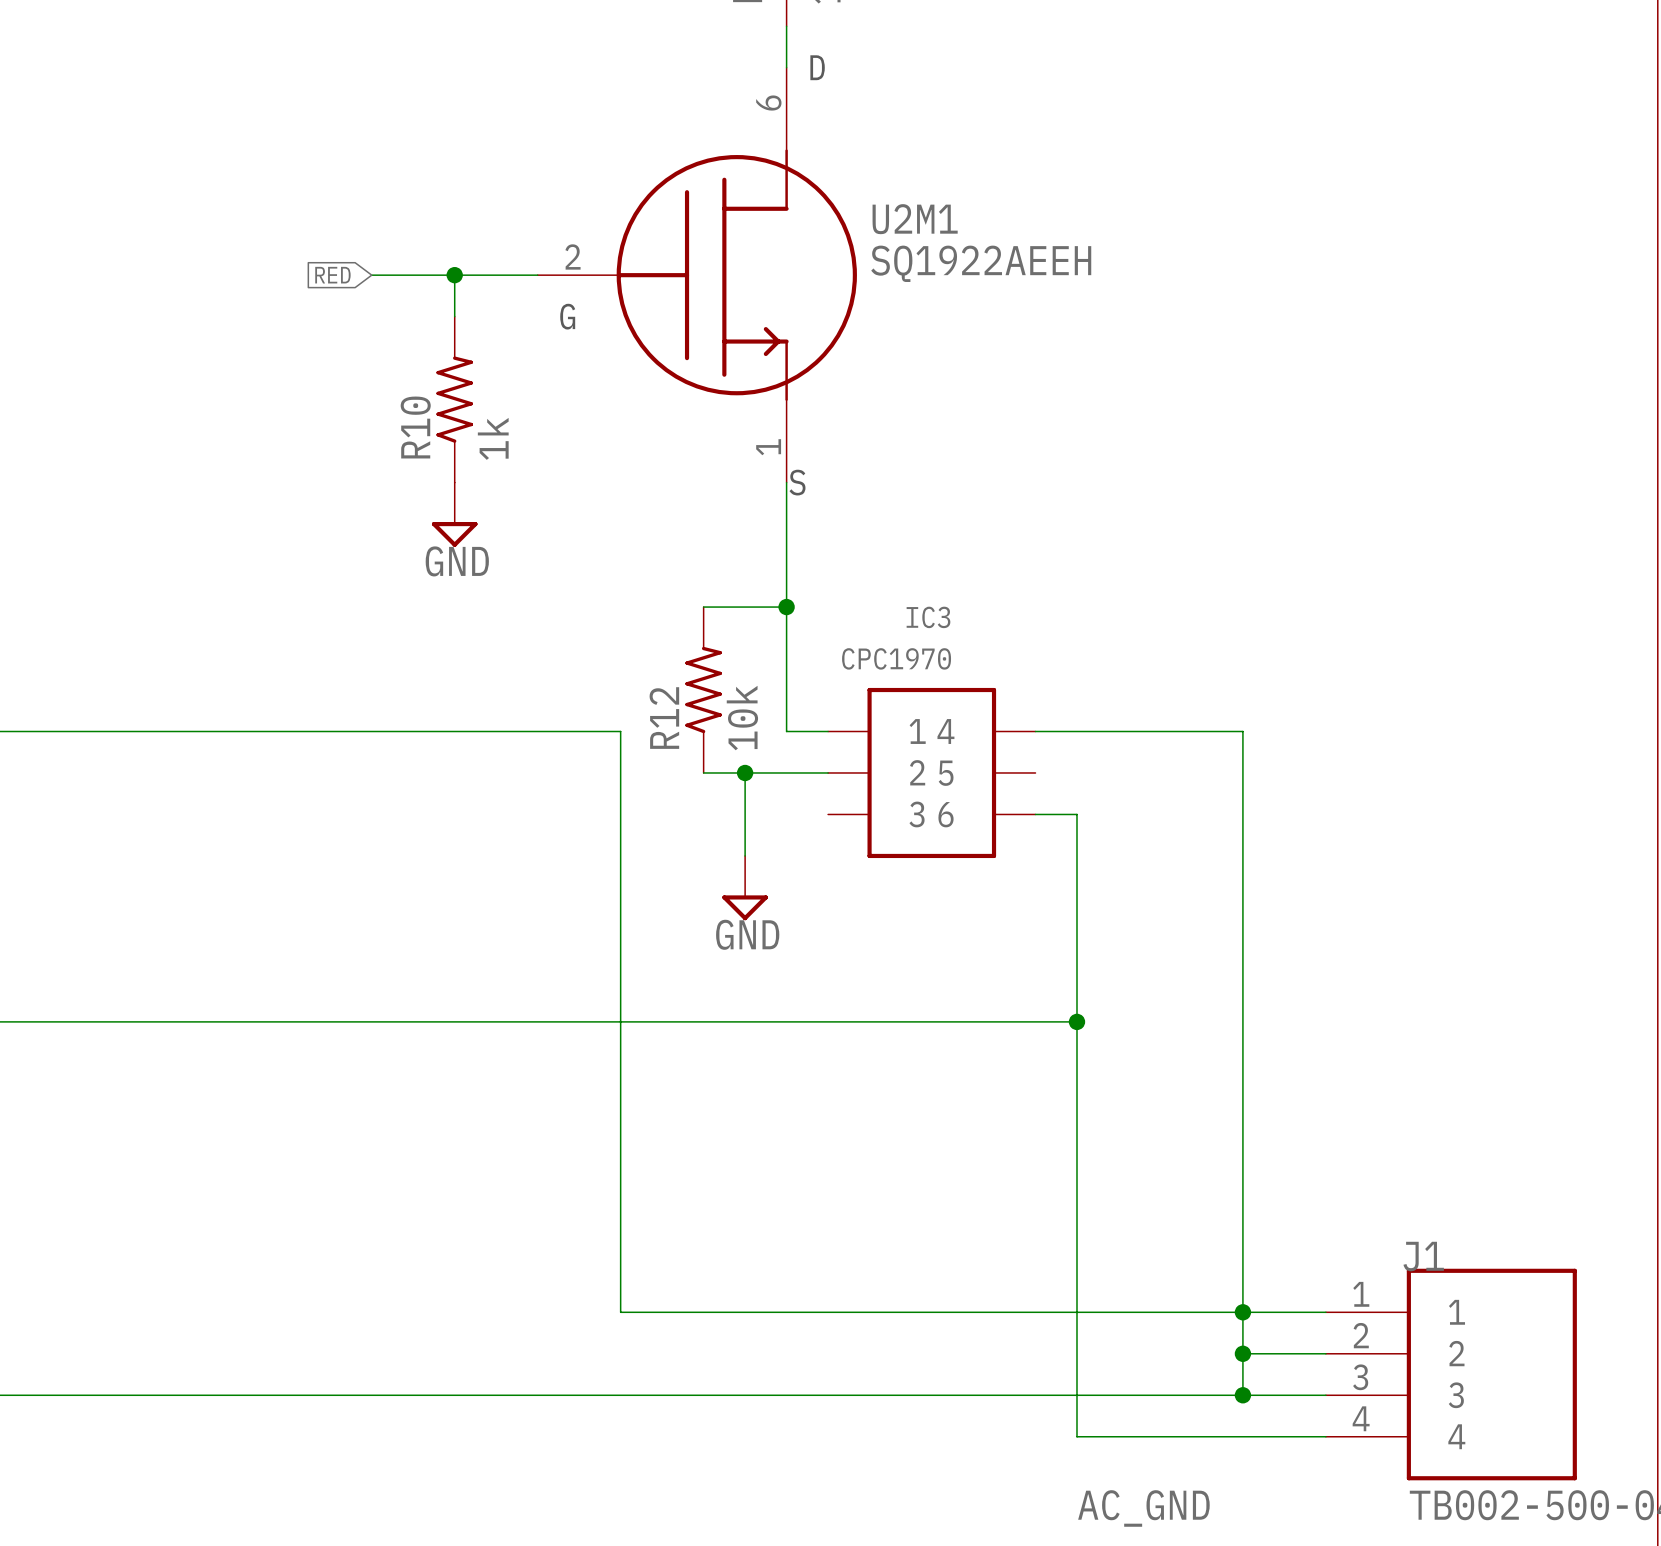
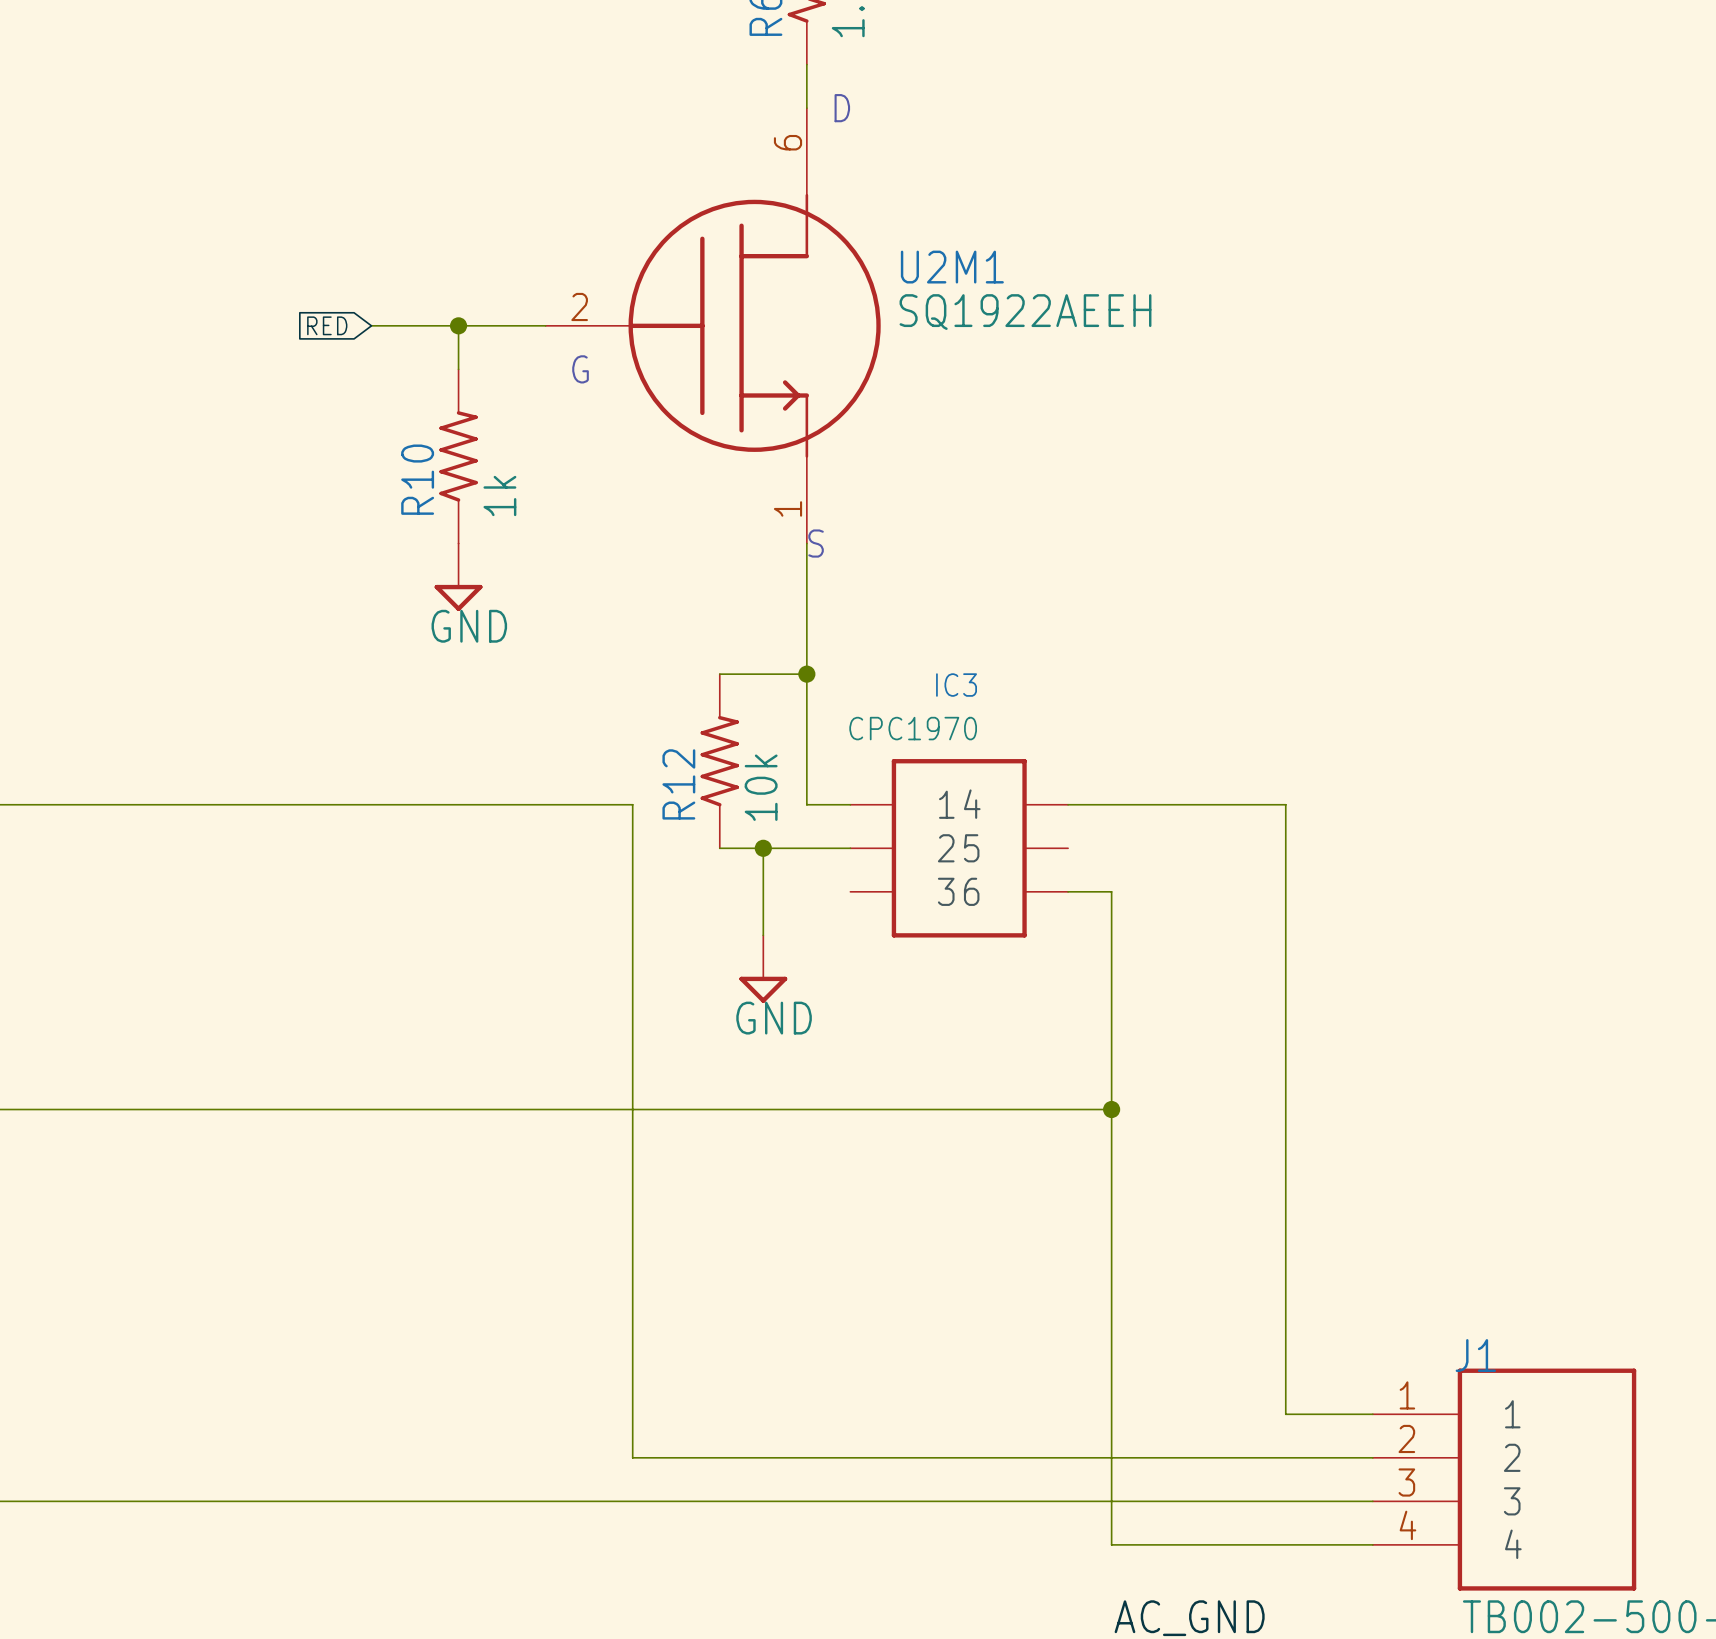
wire: (620, 1312) (1242, 1312) (1242, 1395) -> (632, 1414) (632, 1457) (1285, 1457)
junction: (1242, 1312) -> none
junction: (1242, 1353) -> none
junction: (1242, 1395) -> none

